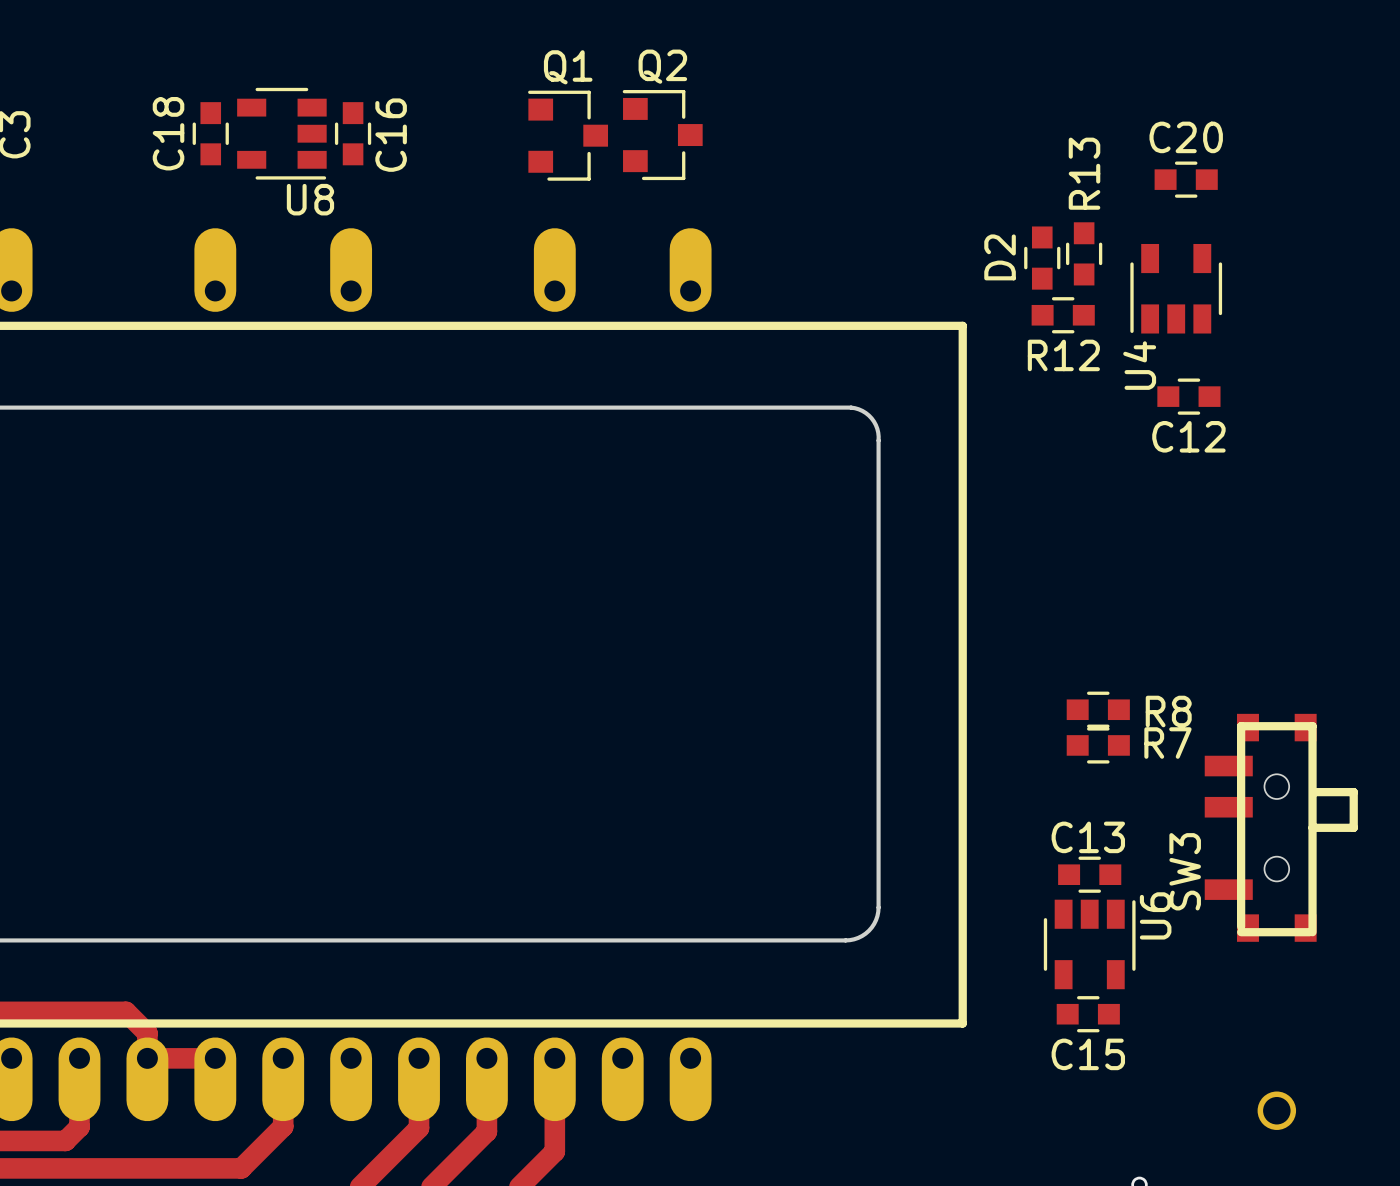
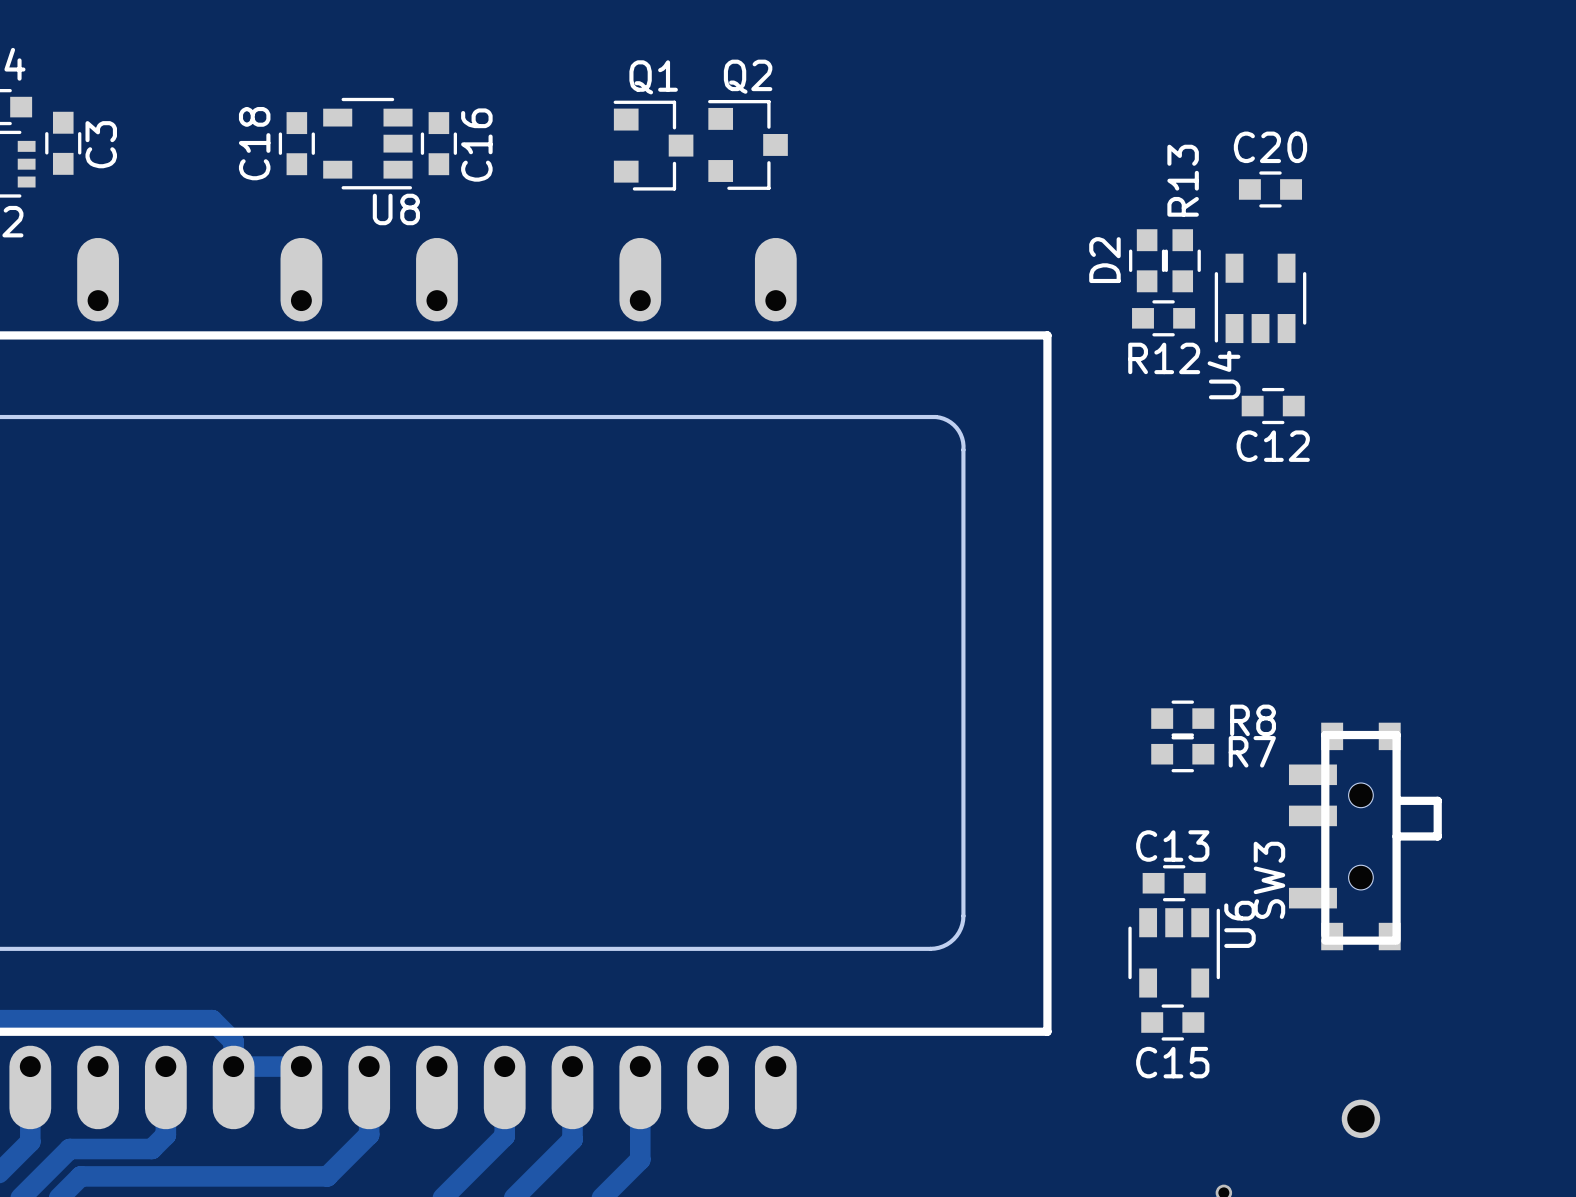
R13 position: (1084, 253) -> (1182, 260)
D2 position: (1042, 258) -> (1147, 260)
R12 position: (1063, 315) -> (1163, 318)

